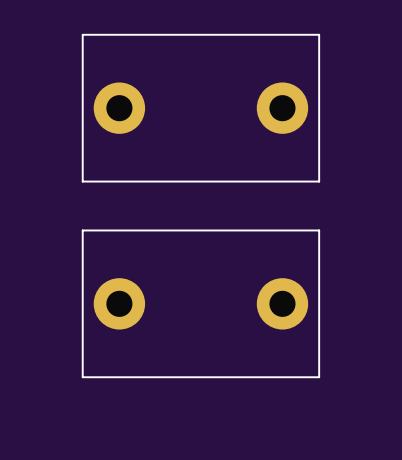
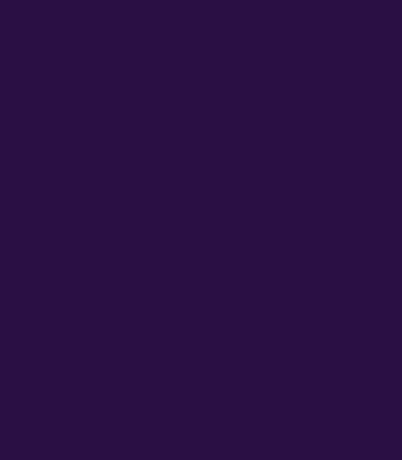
part: (200, 108) -> none
part: (200, 303) -> none

